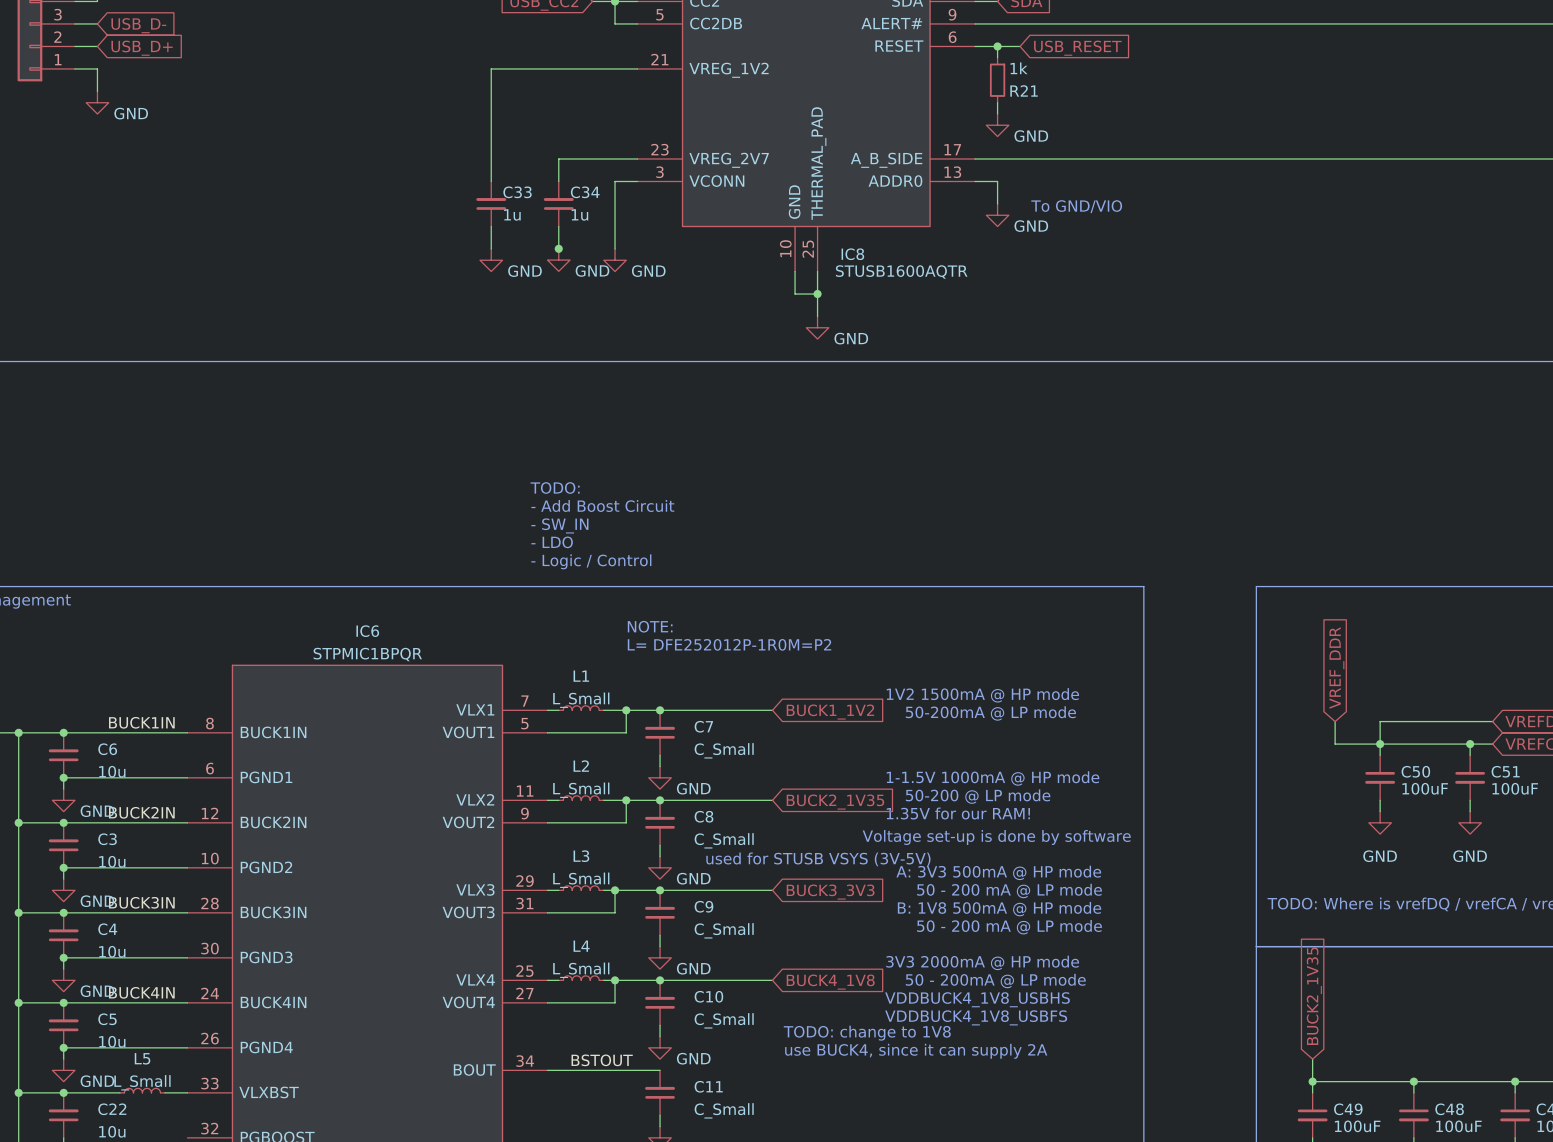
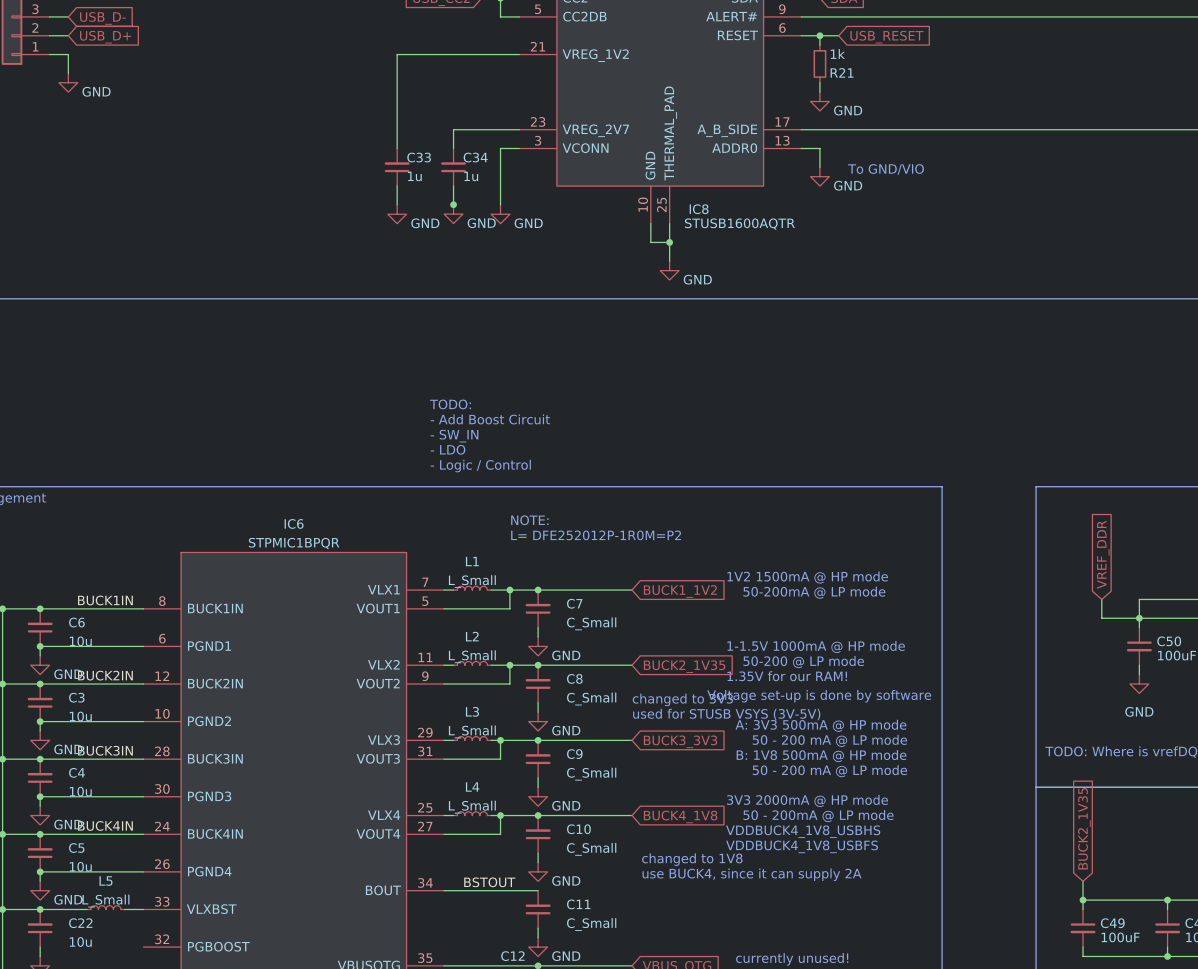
text: none -> changed to 3V3 (682, 699)
text position: used for STUSB VSYS (3V-5V) (818, 859) -> used for STUSB VSYS (3V-5V) (726, 714)
text: TODO: change to 1V8 (867, 1033) -> changed to 1V8 (692, 859)

